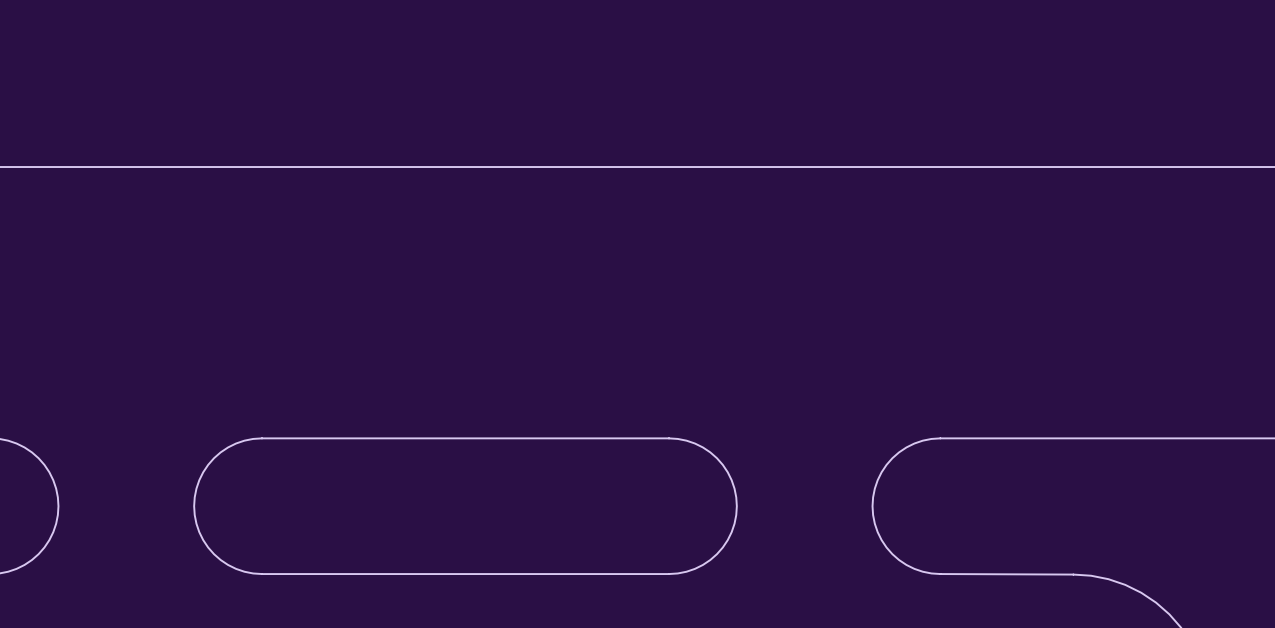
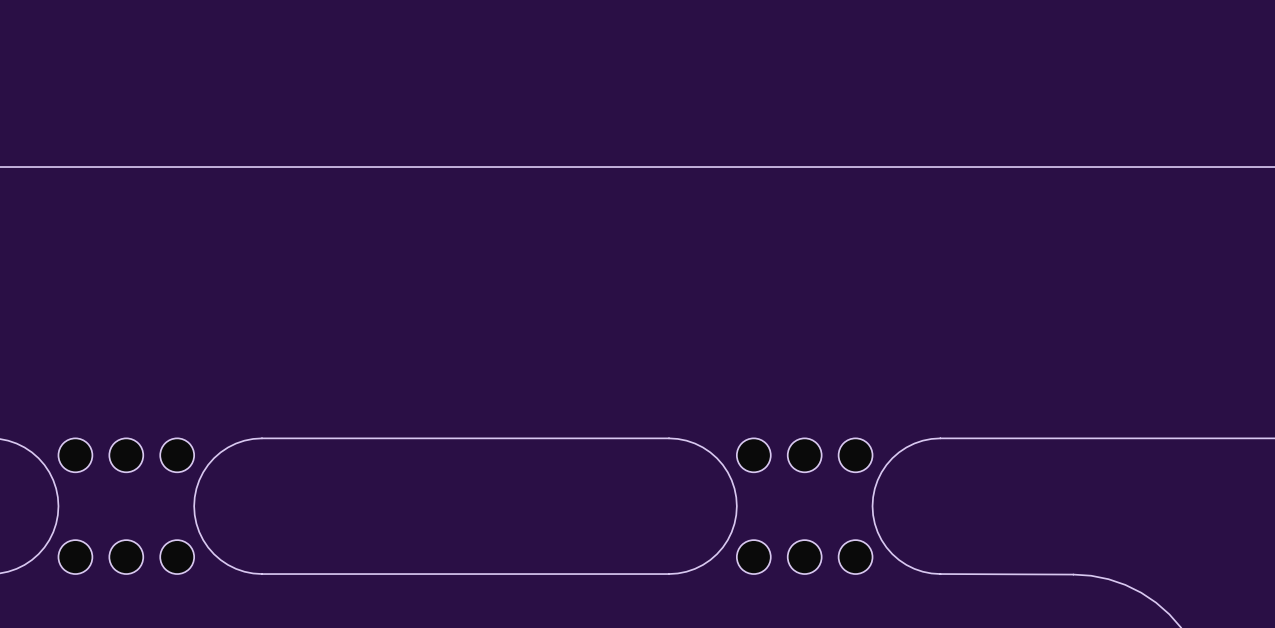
part: none -> (126, 506)
part: none -> (804, 506)

